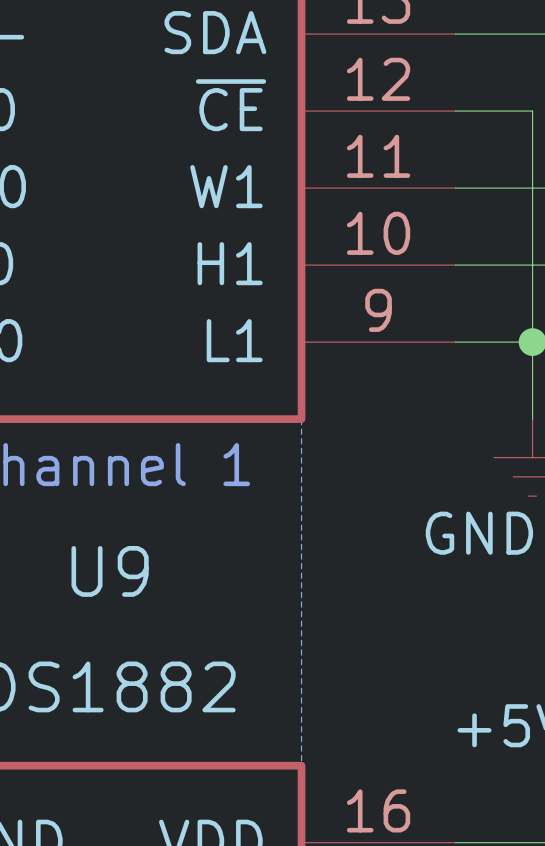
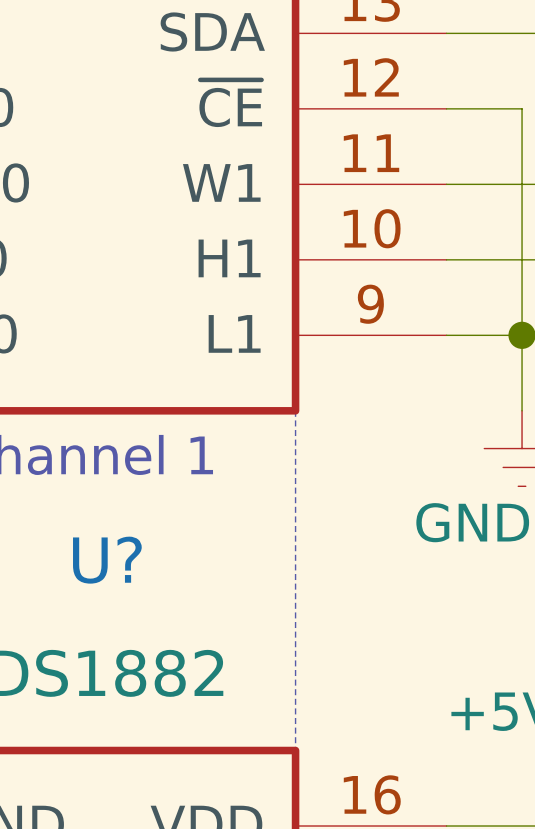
U9 name: U9 (110, 571) -> U? (107, 560)

